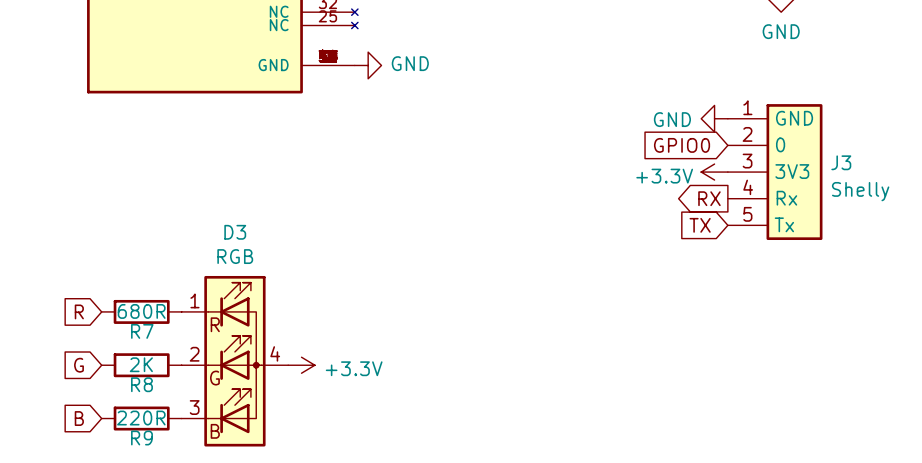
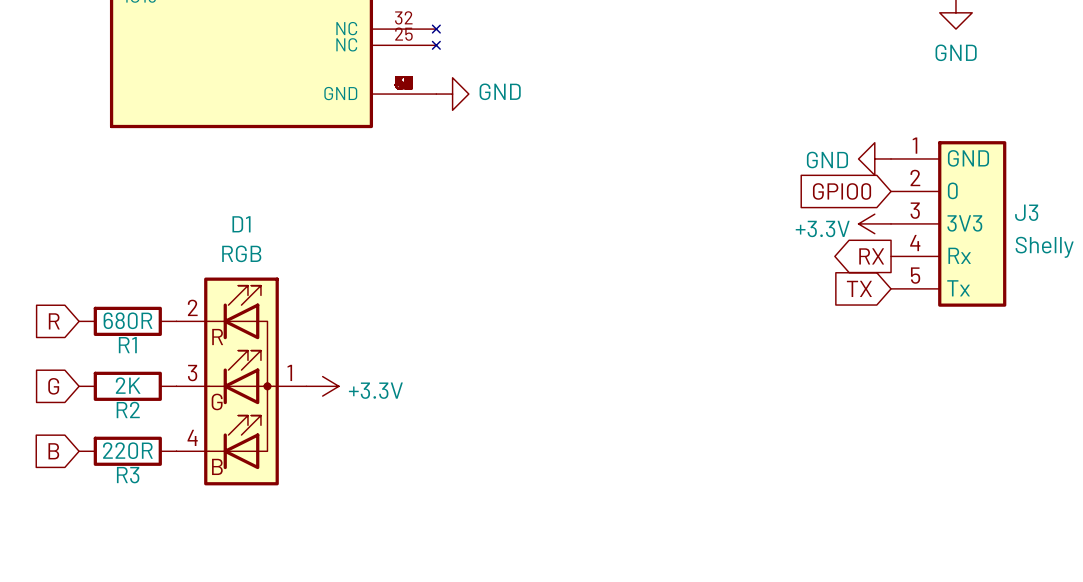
R1: none -> 680R (127, 321)
D1: none -> RGB (241, 381)
R2: none -> 2K (127, 386)
global label position: R (79, 311) -> R (54, 321)
R7: 680R (141, 311) -> none
R3: none -> 220R (127, 451)
D3: RGB (234, 361) -> none
global label position: G (79, 365) -> G (53, 386)
R8: 2K (141, 365) -> none
power symbol position: +3.3V (301, 365) -> +3.3V (322, 386)
global label position: B (79, 418) -> B (53, 451)
R9: 220R (141, 418) -> none

